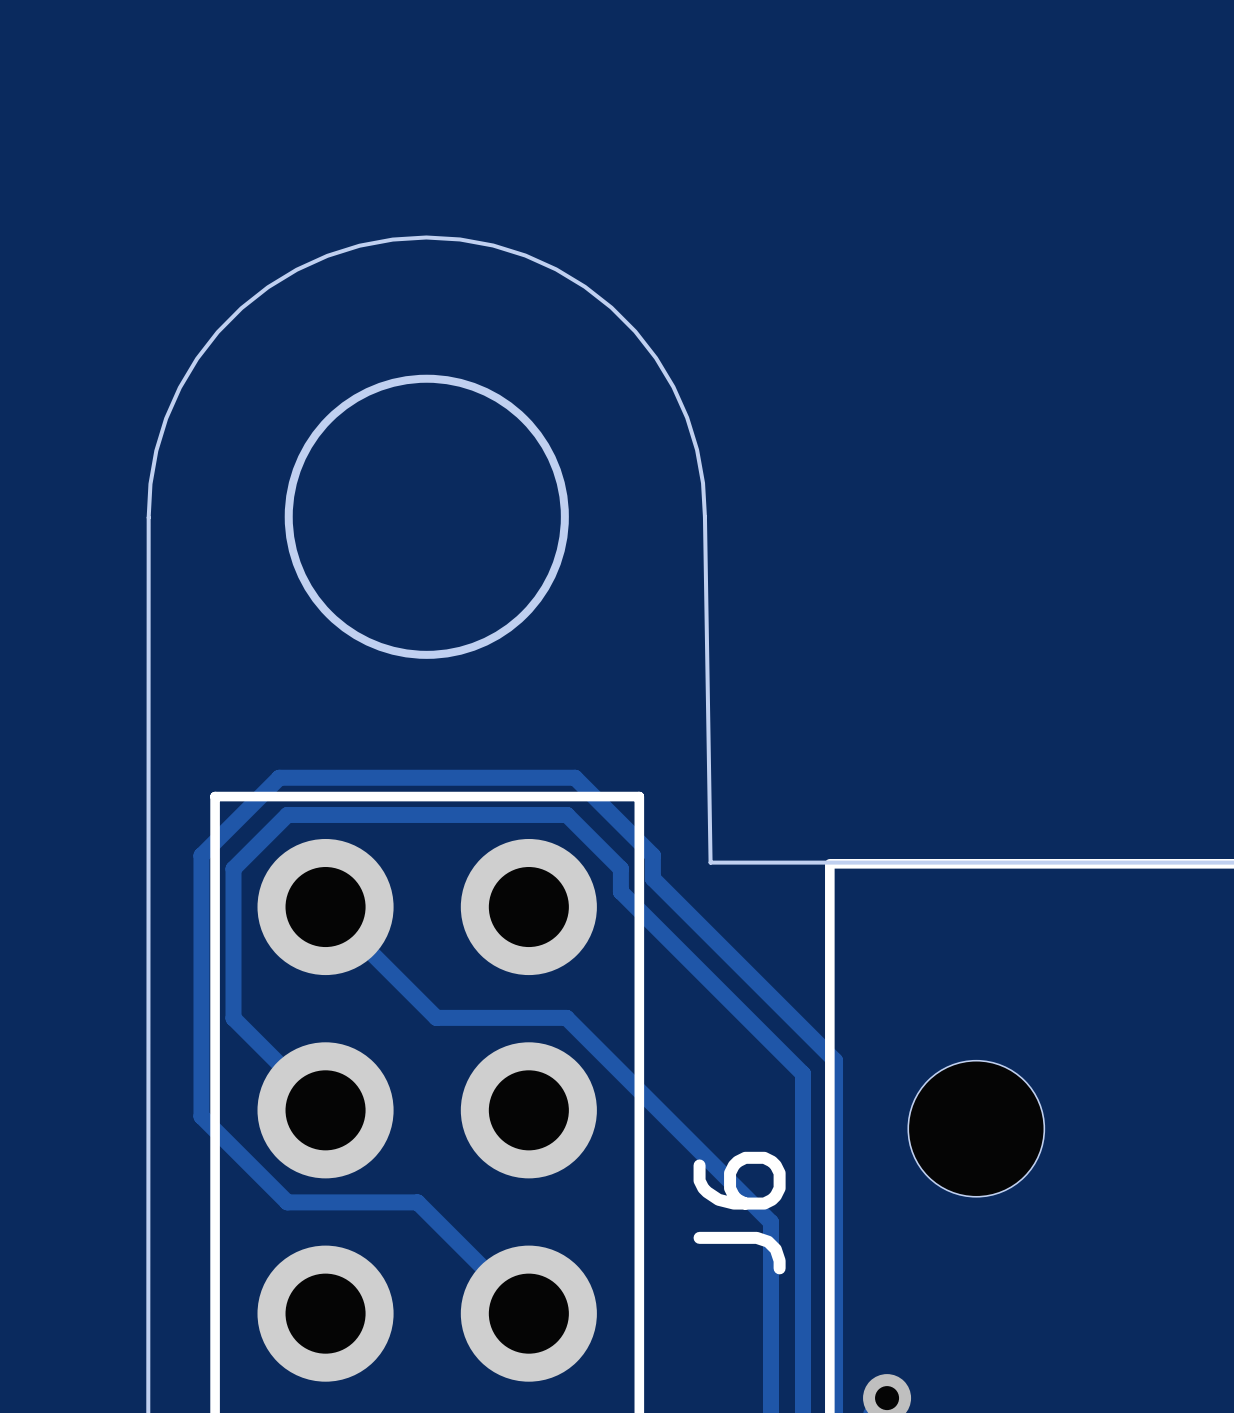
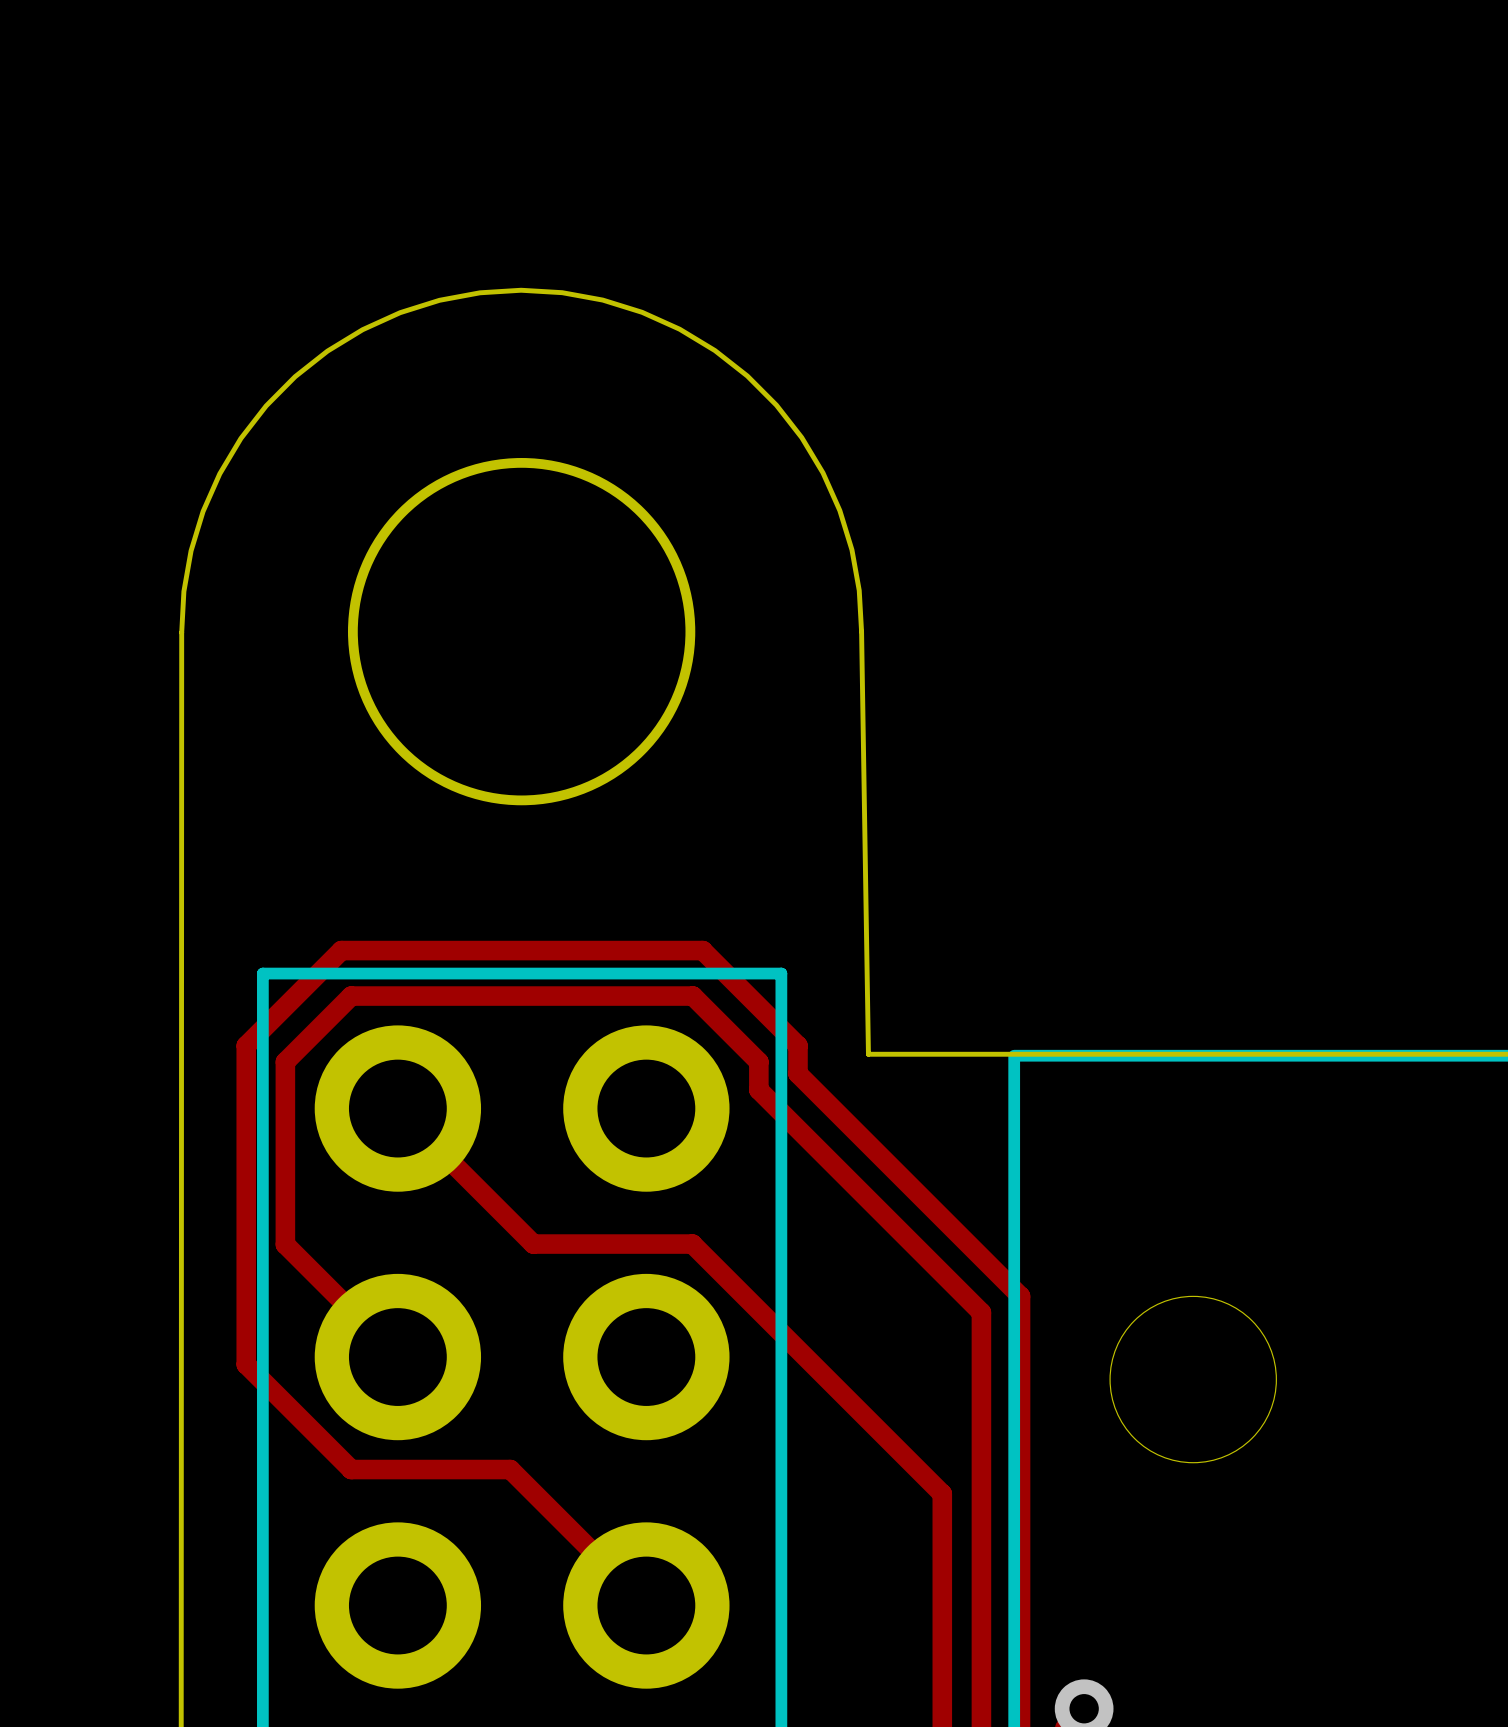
J6 name: J6 (739, 1213) -> none

